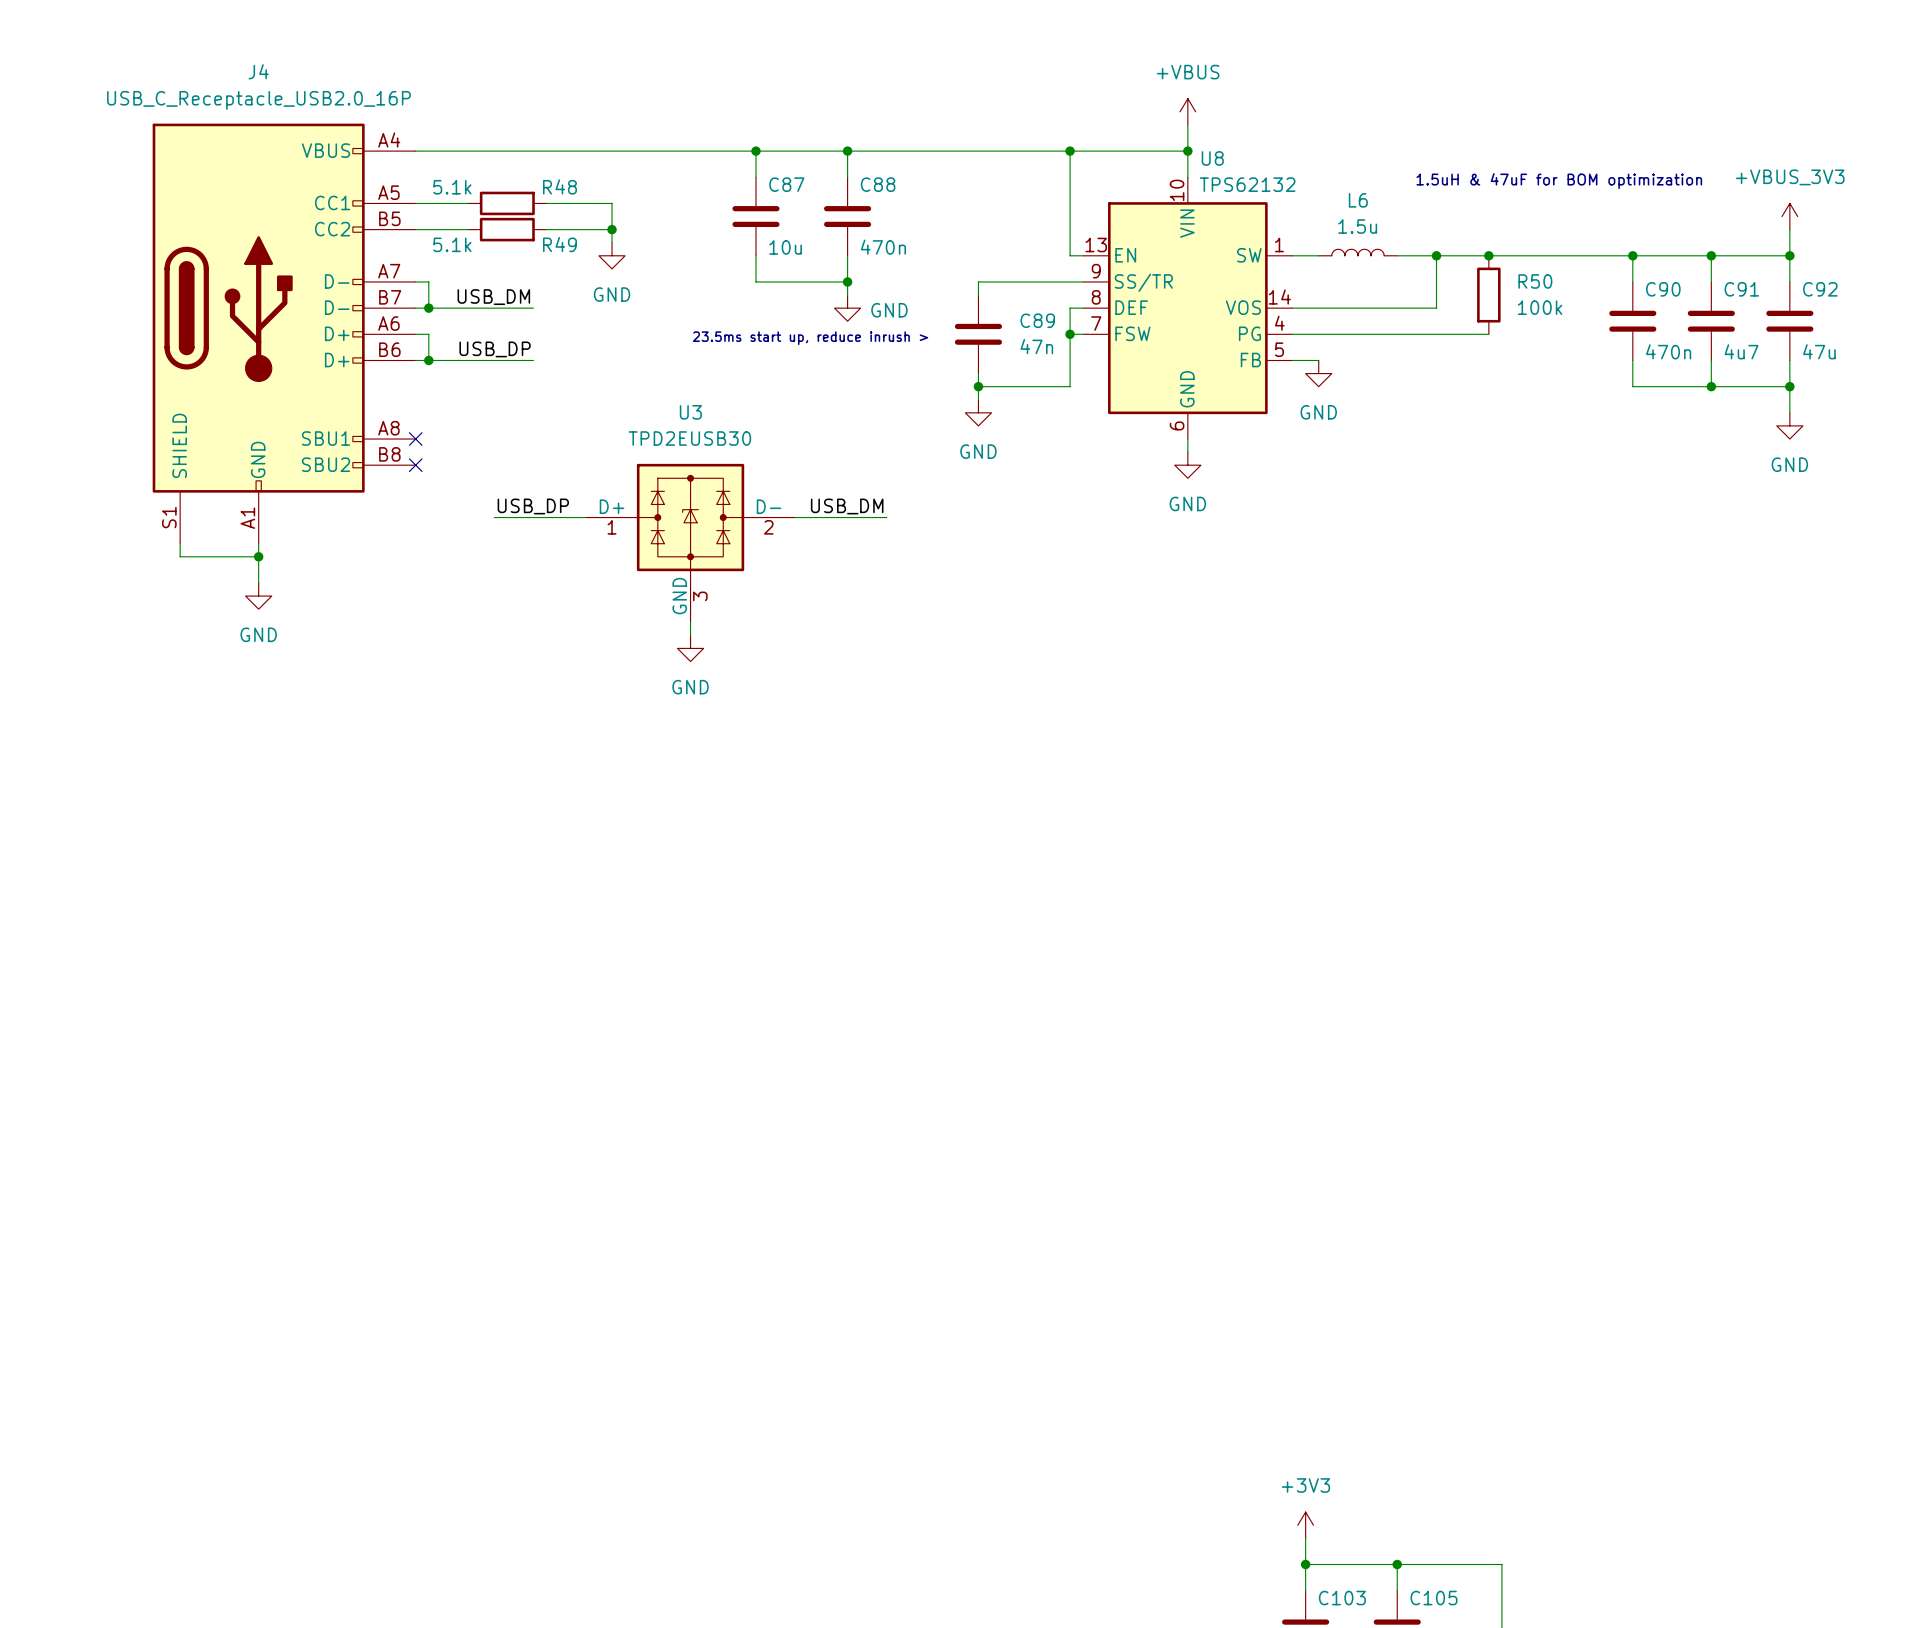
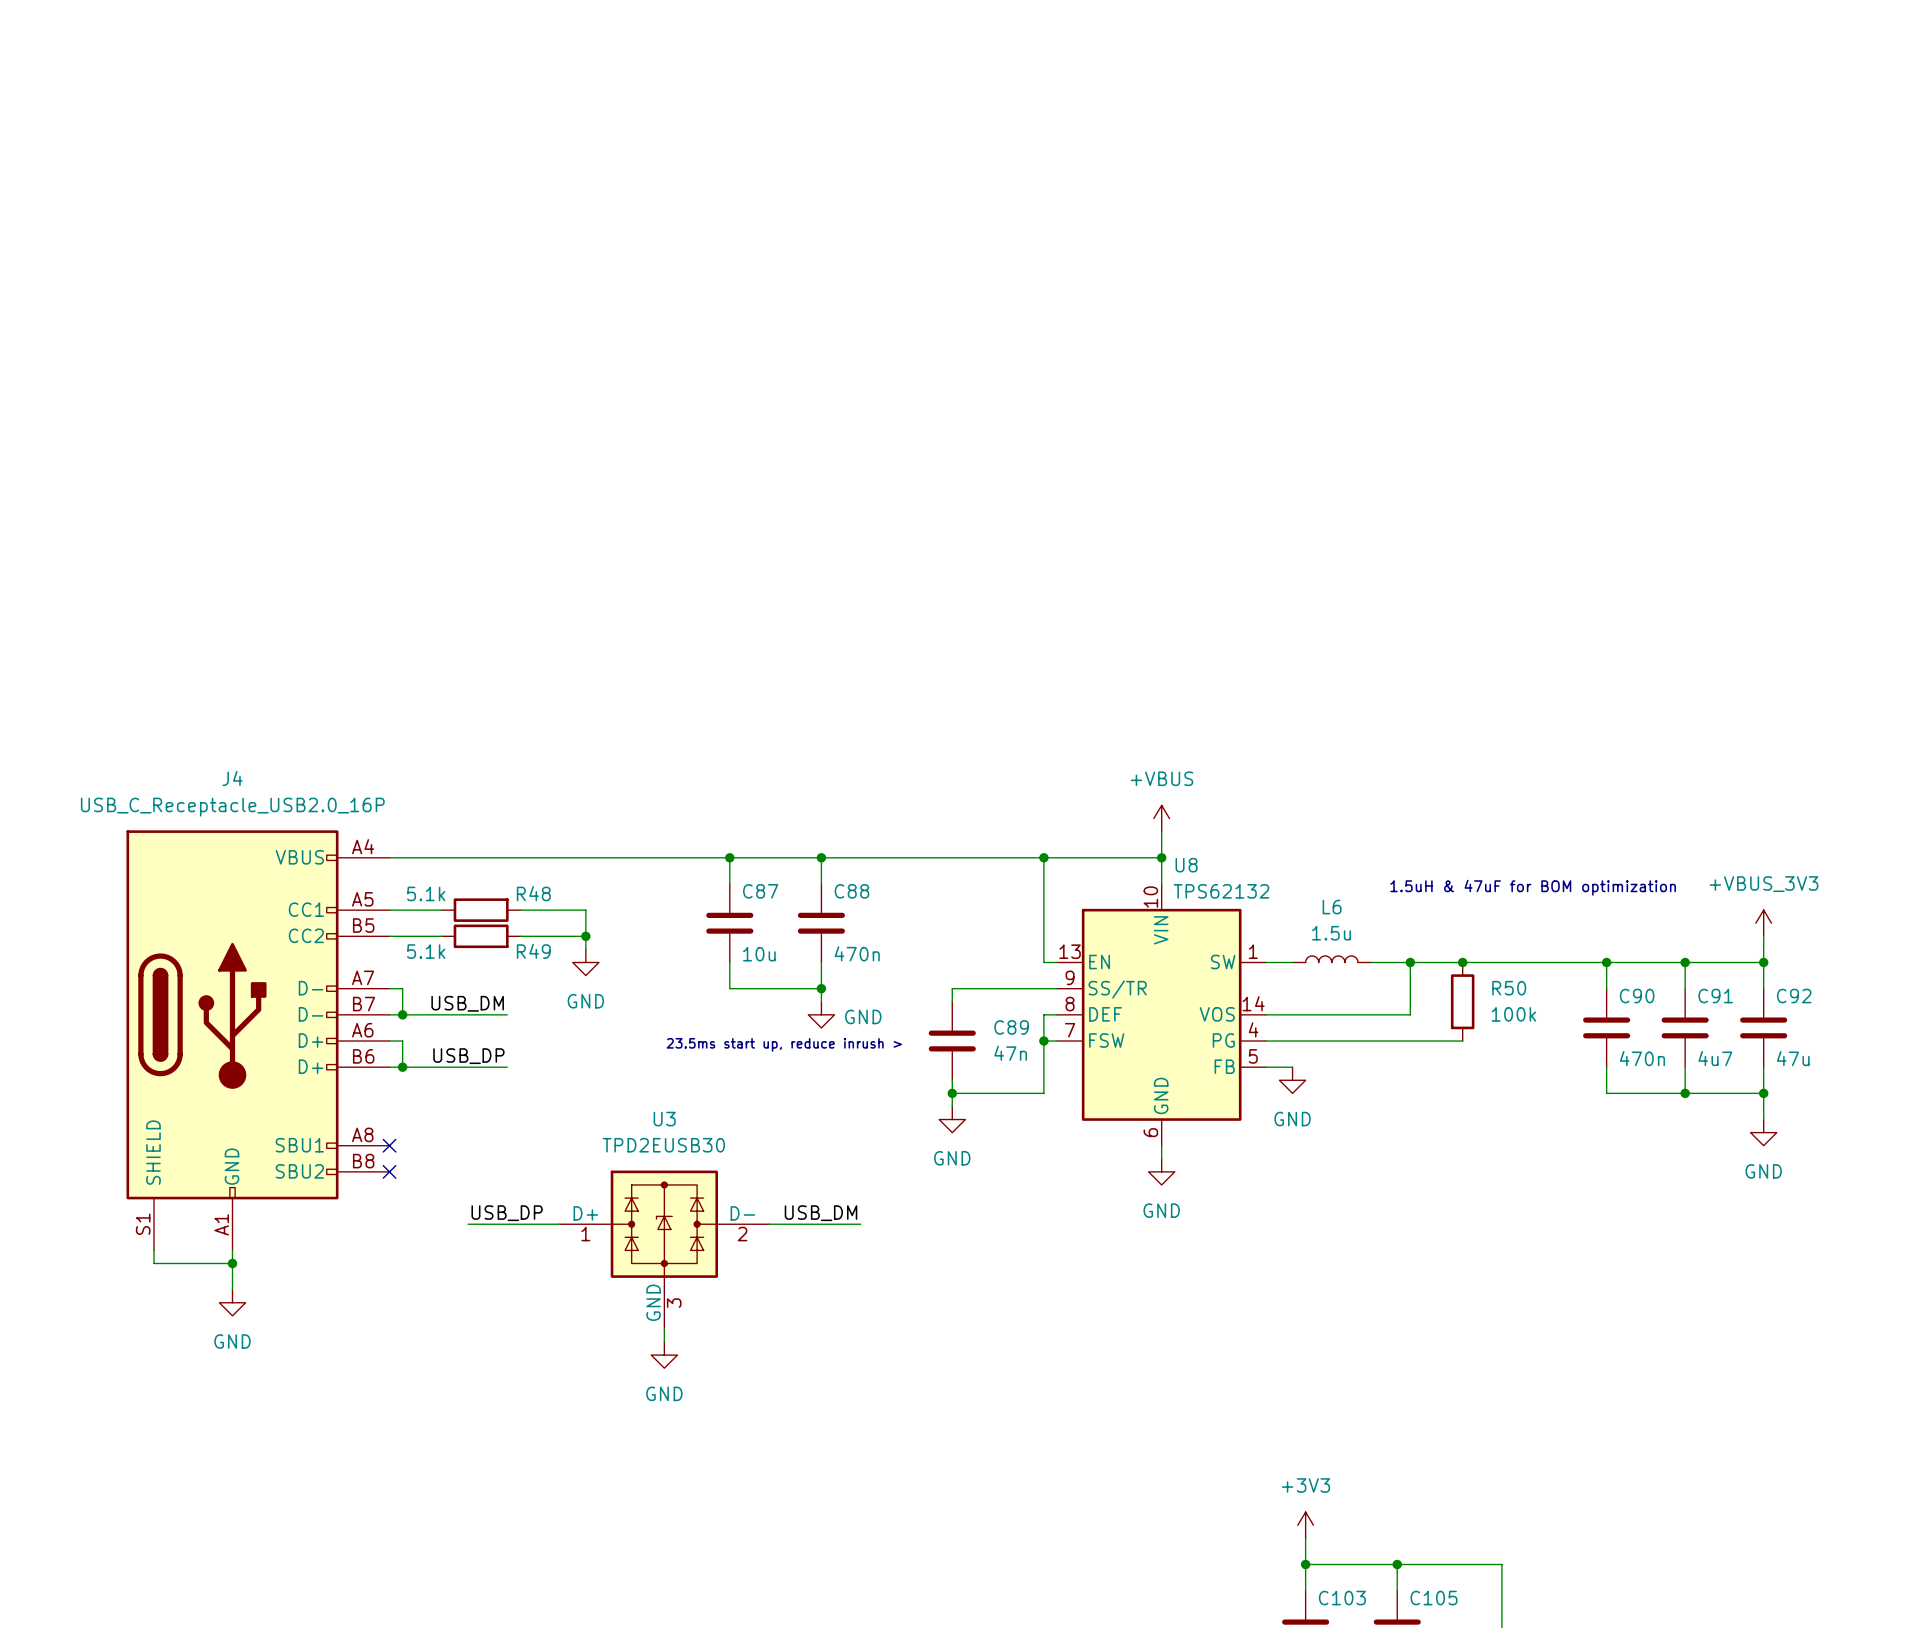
power symbol: +VBUS (1187, 111) -> none
wire: (1187, 124) (1187, 177) -> none
wire: (415, 151) (1187, 151) -> none
wire: (755, 151) (755, 177) -> none
junction: (755, 151) -> none
wire: (847, 151) (847, 177) -> none
junction: (847, 151) -> none
wire: (1070, 151) (1070, 255) (1083, 255) -> none
junction: (1070, 151) -> none
junction: (1187, 151) -> none
text: 1.5uH & 47uF for BOM optimization (1559, 181) -> none
wire: (415, 203) (468, 203) -> none
R48 position: (507, 203) -> (481, 910)
wire: (546, 203) (612, 203) (612, 242) -> none
C87 position: (755, 216) -> (729, 923)
C88 position: (847, 216) -> (821, 923)
power symbol: +VBUS_3V3 (1789, 216) -> none
wire: (415, 229) (468, 229) -> none
R49 position: (507, 229) -> (481, 936)
wire: (546, 229) (612, 229) -> none
junction: (612, 229) -> none
wire: (1789, 229) (1789, 281) -> none
L6 position: (1357, 252) -> (1331, 959)
power symbol: GND (612, 255) -> none
wire: (755, 255) (755, 281) (847, 281) -> none
wire: (847, 255) (847, 295) -> none
wire: (1292, 255) (1318, 255) -> none
wire: (1397, 255) (1789, 255) -> none
wire: (1436, 255) (1436, 308) (1292, 308) -> none
junction: (1436, 255) -> none
junction: (1488, 255) -> none
wire: (1632, 255) (1632, 281) -> none
junction: (1632, 255) -> none
wire: (1711, 255) (1711, 281) -> none
junction: (1711, 255) -> none
junction: (1789, 255) -> none
wire: (415, 281) (428, 281) (428, 308) -> none
junction: (847, 281) -> none
wire: (1083, 281) (978, 281) (978, 295) -> none
R50 position: (1488, 295) -> (1462, 1001)
label: USB_DM (493, 297) -> none
wire: (415, 308) (533, 308) -> none
junction: (428, 308) -> none
power symbol: GND (847, 308) -> none
wire: (1083, 308) (1070, 308) (1070, 386) (978, 386) -> none
U8 position: (1187, 308) -> (1161, 1014)
C90 position: (1632, 321) -> (1606, 1027)
C91 position: (1711, 321) -> (1685, 1027)
C92 position: (1789, 321) -> (1763, 1027)
J4 position: (284, 333) -> (258, 1040)
wire: (415, 334) (428, 334) (428, 360) -> none
C89 position: (978, 334) -> (952, 1041)
wire: (1070, 334) (1083, 334) -> none
junction: (1070, 334) -> none
wire: (1292, 334) (1488, 334) -> none
text: 23.5ms start up, reduce inrush > (810, 338) -> none
label: USB_DP (495, 349) -> none
wire: (415, 360) (533, 360) -> none
junction: (428, 360) -> none
wire: (1292, 360) (1318, 360) -> none
wire: (1632, 360) (1632, 386) (1789, 386) -> none
wire: (1711, 360) (1711, 386) -> none
wire: (1789, 360) (1789, 412) -> none
wire: (978, 373) (978, 399) -> none
power symbol: GND (1318, 373) -> none
junction: (978, 386) -> none
junction: (1711, 386) -> none
junction: (1789, 386) -> none
power symbol: GND (978, 412) -> none
power symbol: GND (1789, 425) -> none
no-connect mark: (415, 439) -> none
wire: (1187, 439) (1187, 452) -> none
no-connect mark: (415, 465) -> none
power symbol: GND (1187, 465) -> none
label: USB_DP (533, 506) -> none
label: USB_DM (847, 506) -> none
wire: (494, 517) (585, 517) -> none
wire: (795, 517) (886, 517) -> none
wire: (180, 543) (180, 556) (258, 556) -> none
wire: (258, 543) (258, 582) -> none
U3 position: (690, 543) -> (664, 1249)
junction: (258, 556) -> none
power symbol: GND (258, 596) -> none
wire: (690, 622) (690, 635) -> none
power symbol: GND (690, 648) -> none
power symbol: none -> +VBUS (1161, 818)
wire: none -> (1161, 831) (1161, 883)
wire: none -> (389, 857) (1161, 857)
wire: none -> (729, 857) (729, 883)
junction: none -> (729, 857)
wire: none -> (821, 857) (821, 883)
junction: none -> (821, 857)
wire: none -> (1043, 857) (1043, 962) (1056, 962)
junction: none -> (1043, 857)
junction: none -> (1161, 857)
text: none -> 1.5uH & 47uF for BOM optimization (1533, 887)
wire: none -> (389, 910) (441, 910)
wire: none -> (520, 910) (585, 910) (585, 949)
power symbol: none -> +VBUS_3V3 (1763, 923)
wire: none -> (389, 936) (441, 936)
wire: none -> (520, 936) (585, 936)
junction: none -> (585, 936)
wire: none -> (1763, 936) (1763, 988)
power symbol: none -> GND (585, 962)
wire: none -> (729, 962) (729, 988) (821, 988)
wire: none -> (821, 962) (821, 1001)
wire: none -> (1266, 962) (1292, 962)
wire: none -> (1371, 962) (1763, 962)
wire: none -> (1410, 962) (1410, 1014) (1266, 1014)
junction: none -> (1410, 962)
junction: none -> (1462, 962)
wire: none -> (1606, 962) (1606, 988)
junction: none -> (1606, 962)
wire: none -> (1685, 962) (1685, 988)
junction: none -> (1685, 962)
junction: none -> (1763, 962)
wire: none -> (389, 988) (402, 988) (402, 1014)
junction: none -> (821, 988)
wire: none -> (1056, 988) (952, 988) (952, 1001)
label: none -> USB_DM (467, 1003)
wire: none -> (389, 1014) (507, 1014)
junction: none -> (402, 1014)
power symbol: none -> GND (821, 1014)
wire: none -> (1056, 1014) (1043, 1014) (1043, 1093) (952, 1093)
wire: none -> (389, 1041) (402, 1041) (402, 1067)
wire: none -> (1043, 1041) (1056, 1041)
junction: none -> (1043, 1041)
wire: none -> (1266, 1041) (1462, 1041)
text: none -> 23.5ms start up, reduce inrush > (784, 1044)
label: none -> USB_DP (468, 1056)
wire: none -> (389, 1067) (507, 1067)
junction: none -> (402, 1067)
wire: none -> (1266, 1067) (1292, 1067)
wire: none -> (1606, 1067) (1606, 1093) (1763, 1093)
wire: none -> (1685, 1067) (1685, 1093)
wire: none -> (1763, 1067) (1763, 1119)
wire: none -> (952, 1080) (952, 1106)
power symbol: none -> GND (1292, 1080)
junction: none -> (952, 1093)
junction: none -> (1685, 1093)
junction: none -> (1763, 1093)
power symbol: none -> GND (952, 1119)
power symbol: none -> GND (1763, 1132)
no-connect mark: none -> (389, 1145)
wire: none -> (1161, 1145) (1161, 1158)
no-connect mark: none -> (389, 1171)
power symbol: none -> GND (1161, 1171)
label: none -> USB_DP (507, 1213)
label: none -> USB_DM (821, 1213)
wire: none -> (468, 1224) (559, 1224)
wire: none -> (769, 1224) (860, 1224)
wire: none -> (153, 1250) (153, 1263) (232, 1263)
wire: none -> (232, 1250) (232, 1289)
junction: none -> (232, 1263)
power symbol: none -> GND (232, 1302)
wire: none -> (664, 1328) (664, 1342)
power symbol: none -> GND (664, 1355)

